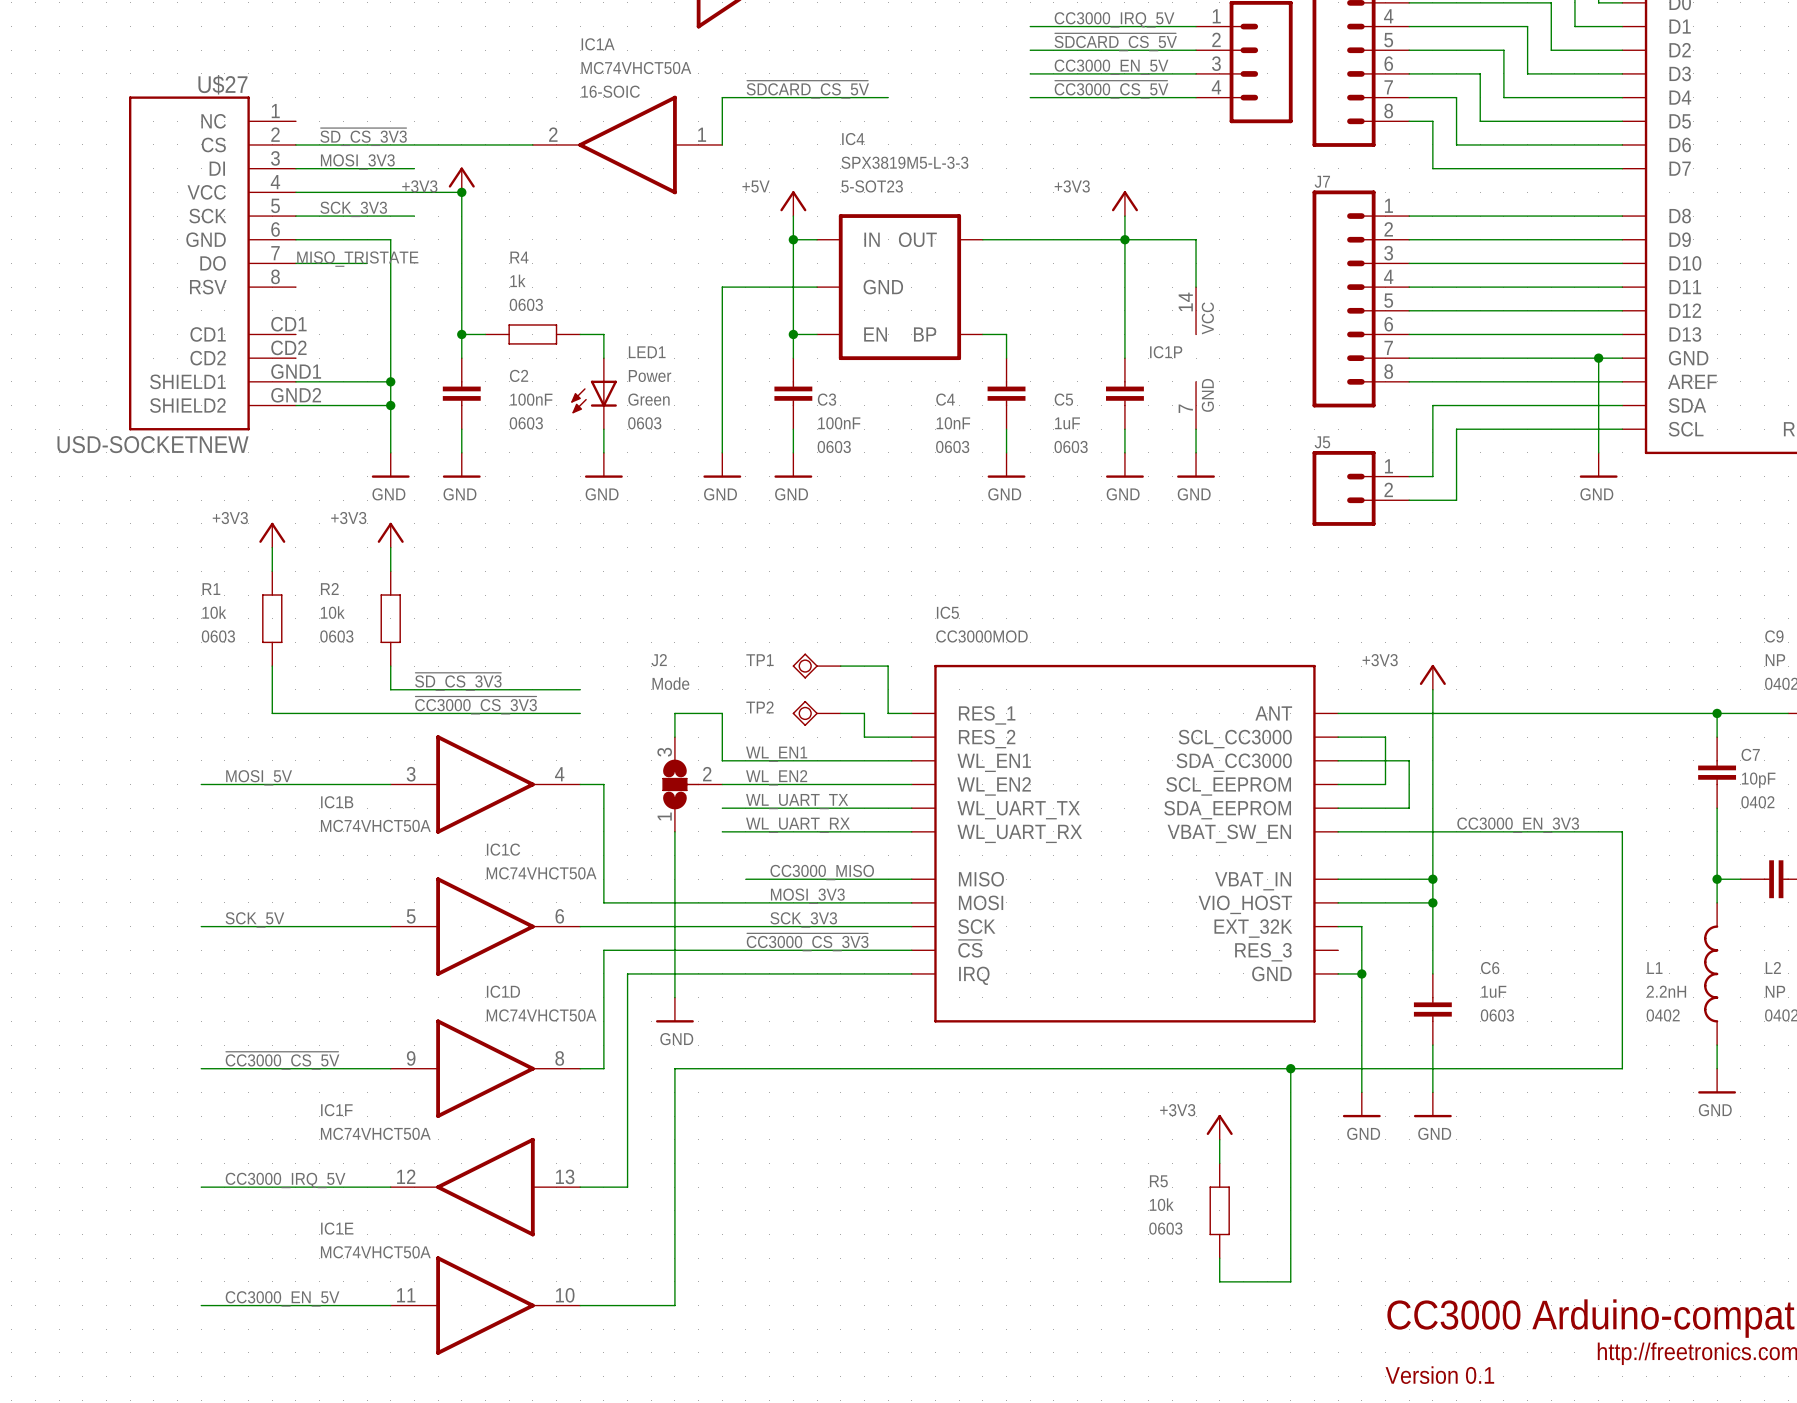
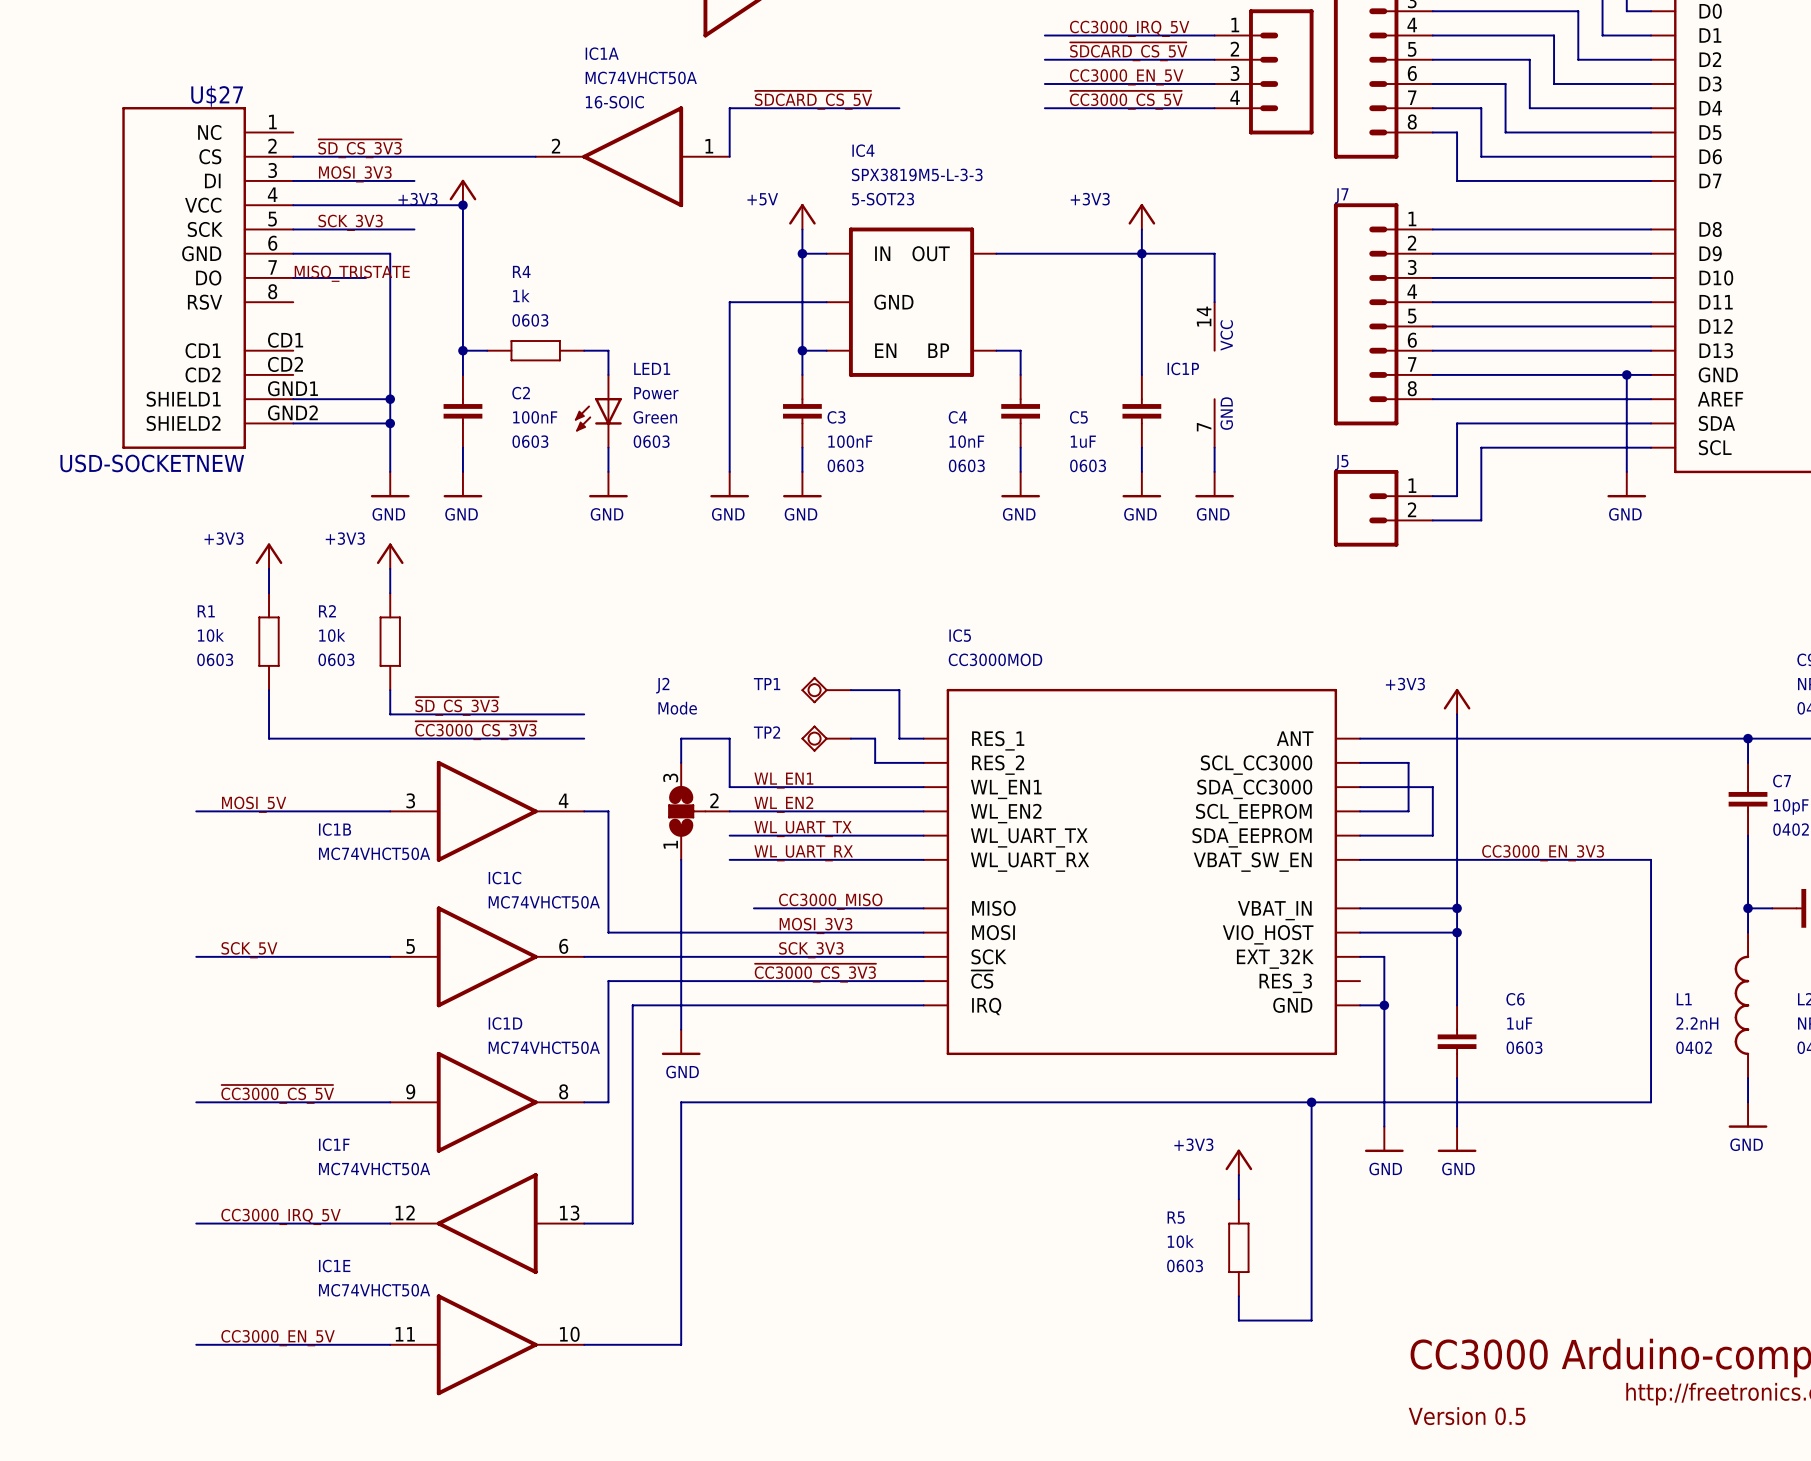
text: Version 0.1 (1439, 1375) -> Version 0.5 (1467, 1416)

